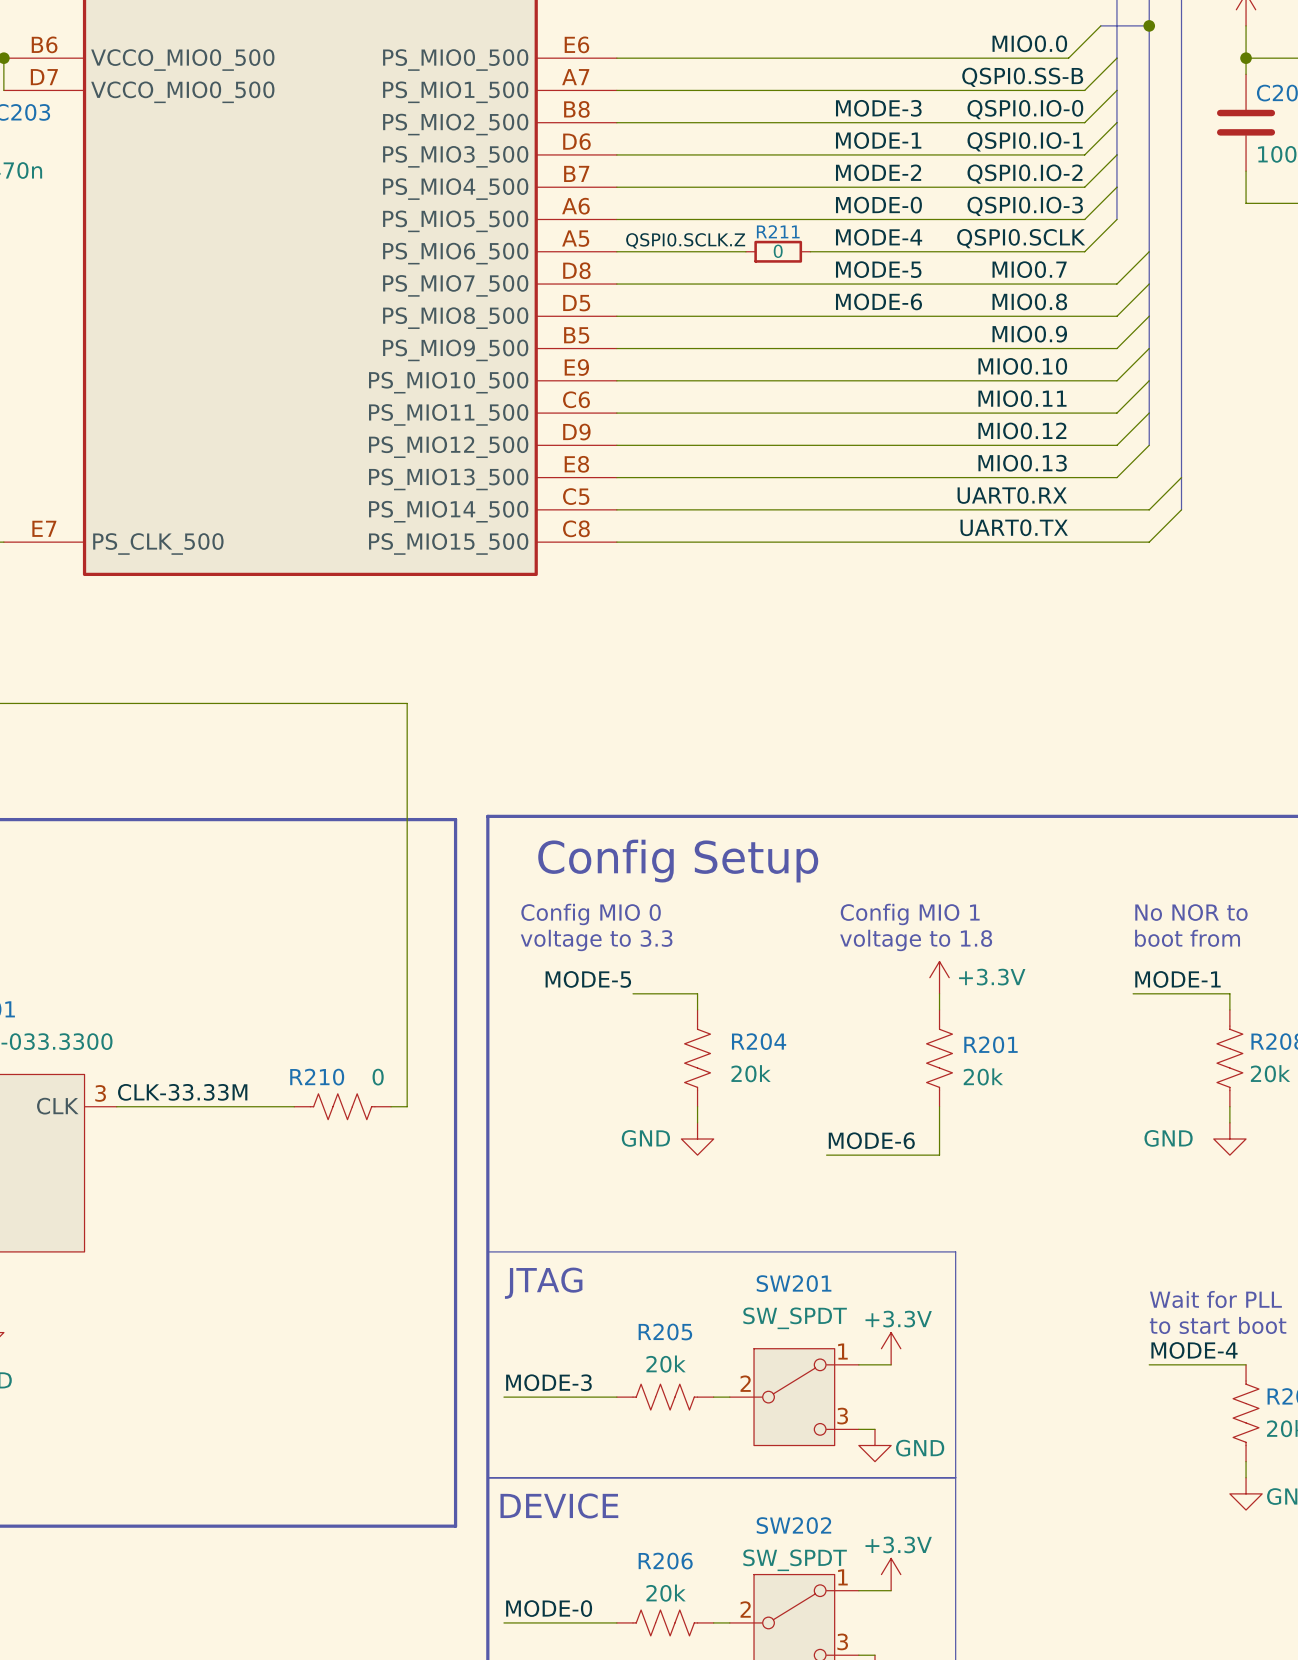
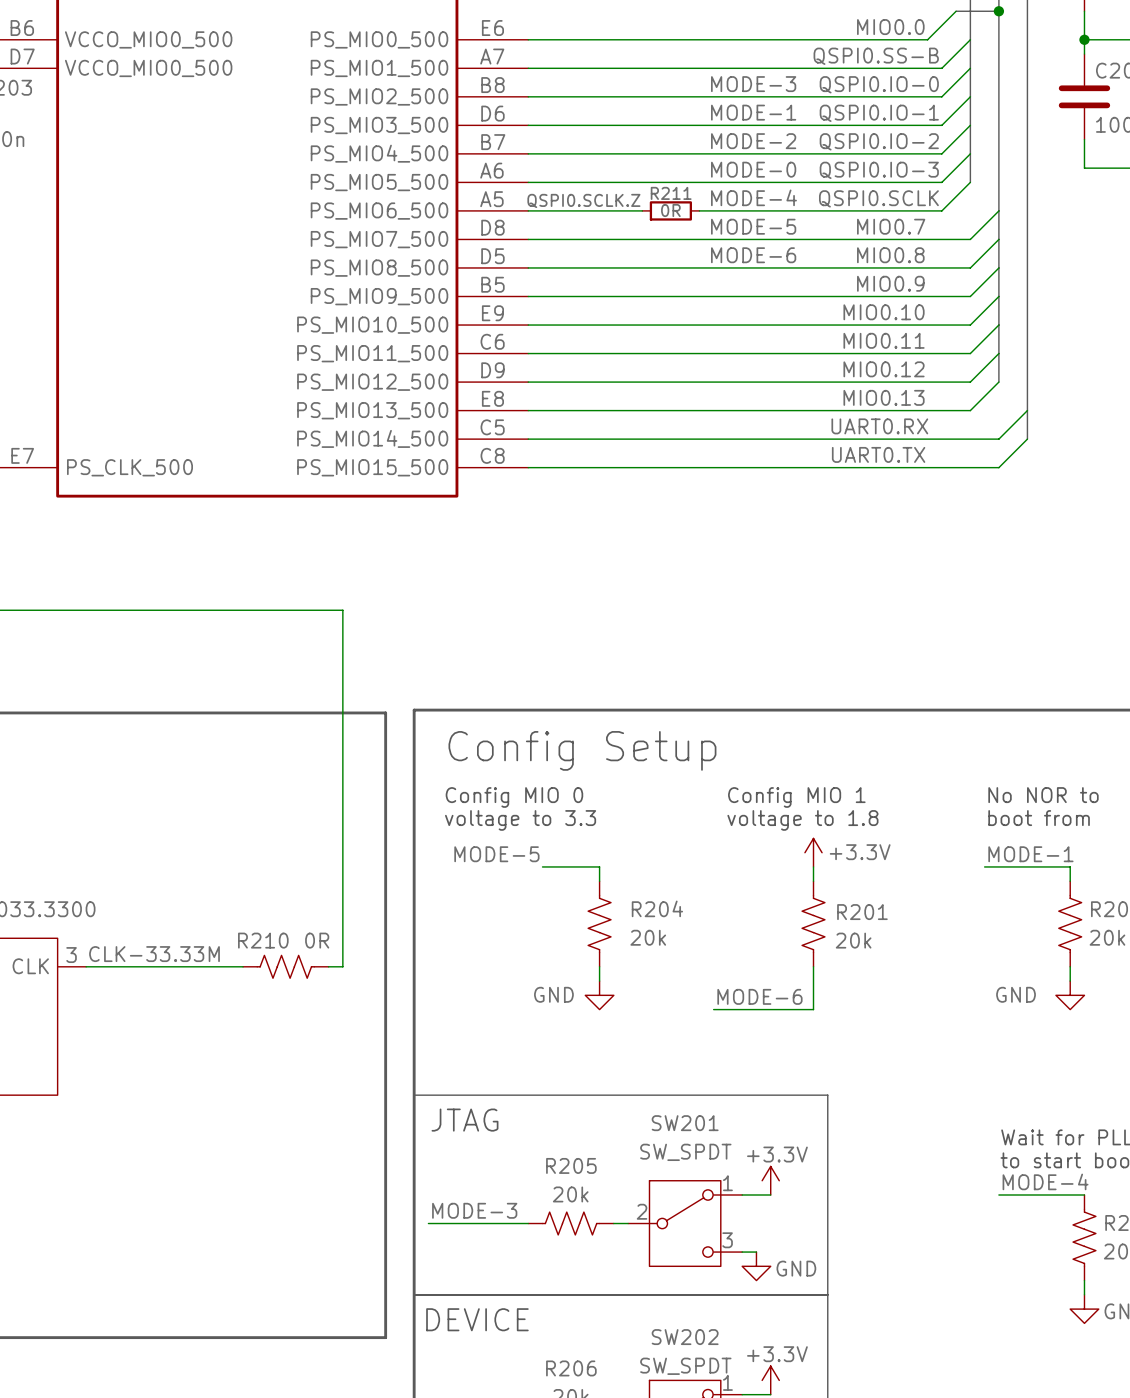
R211 value: 0 (778, 251) -> 0R (670, 210)
R210 value: 0 (378, 1077) -> 0R (317, 940)

